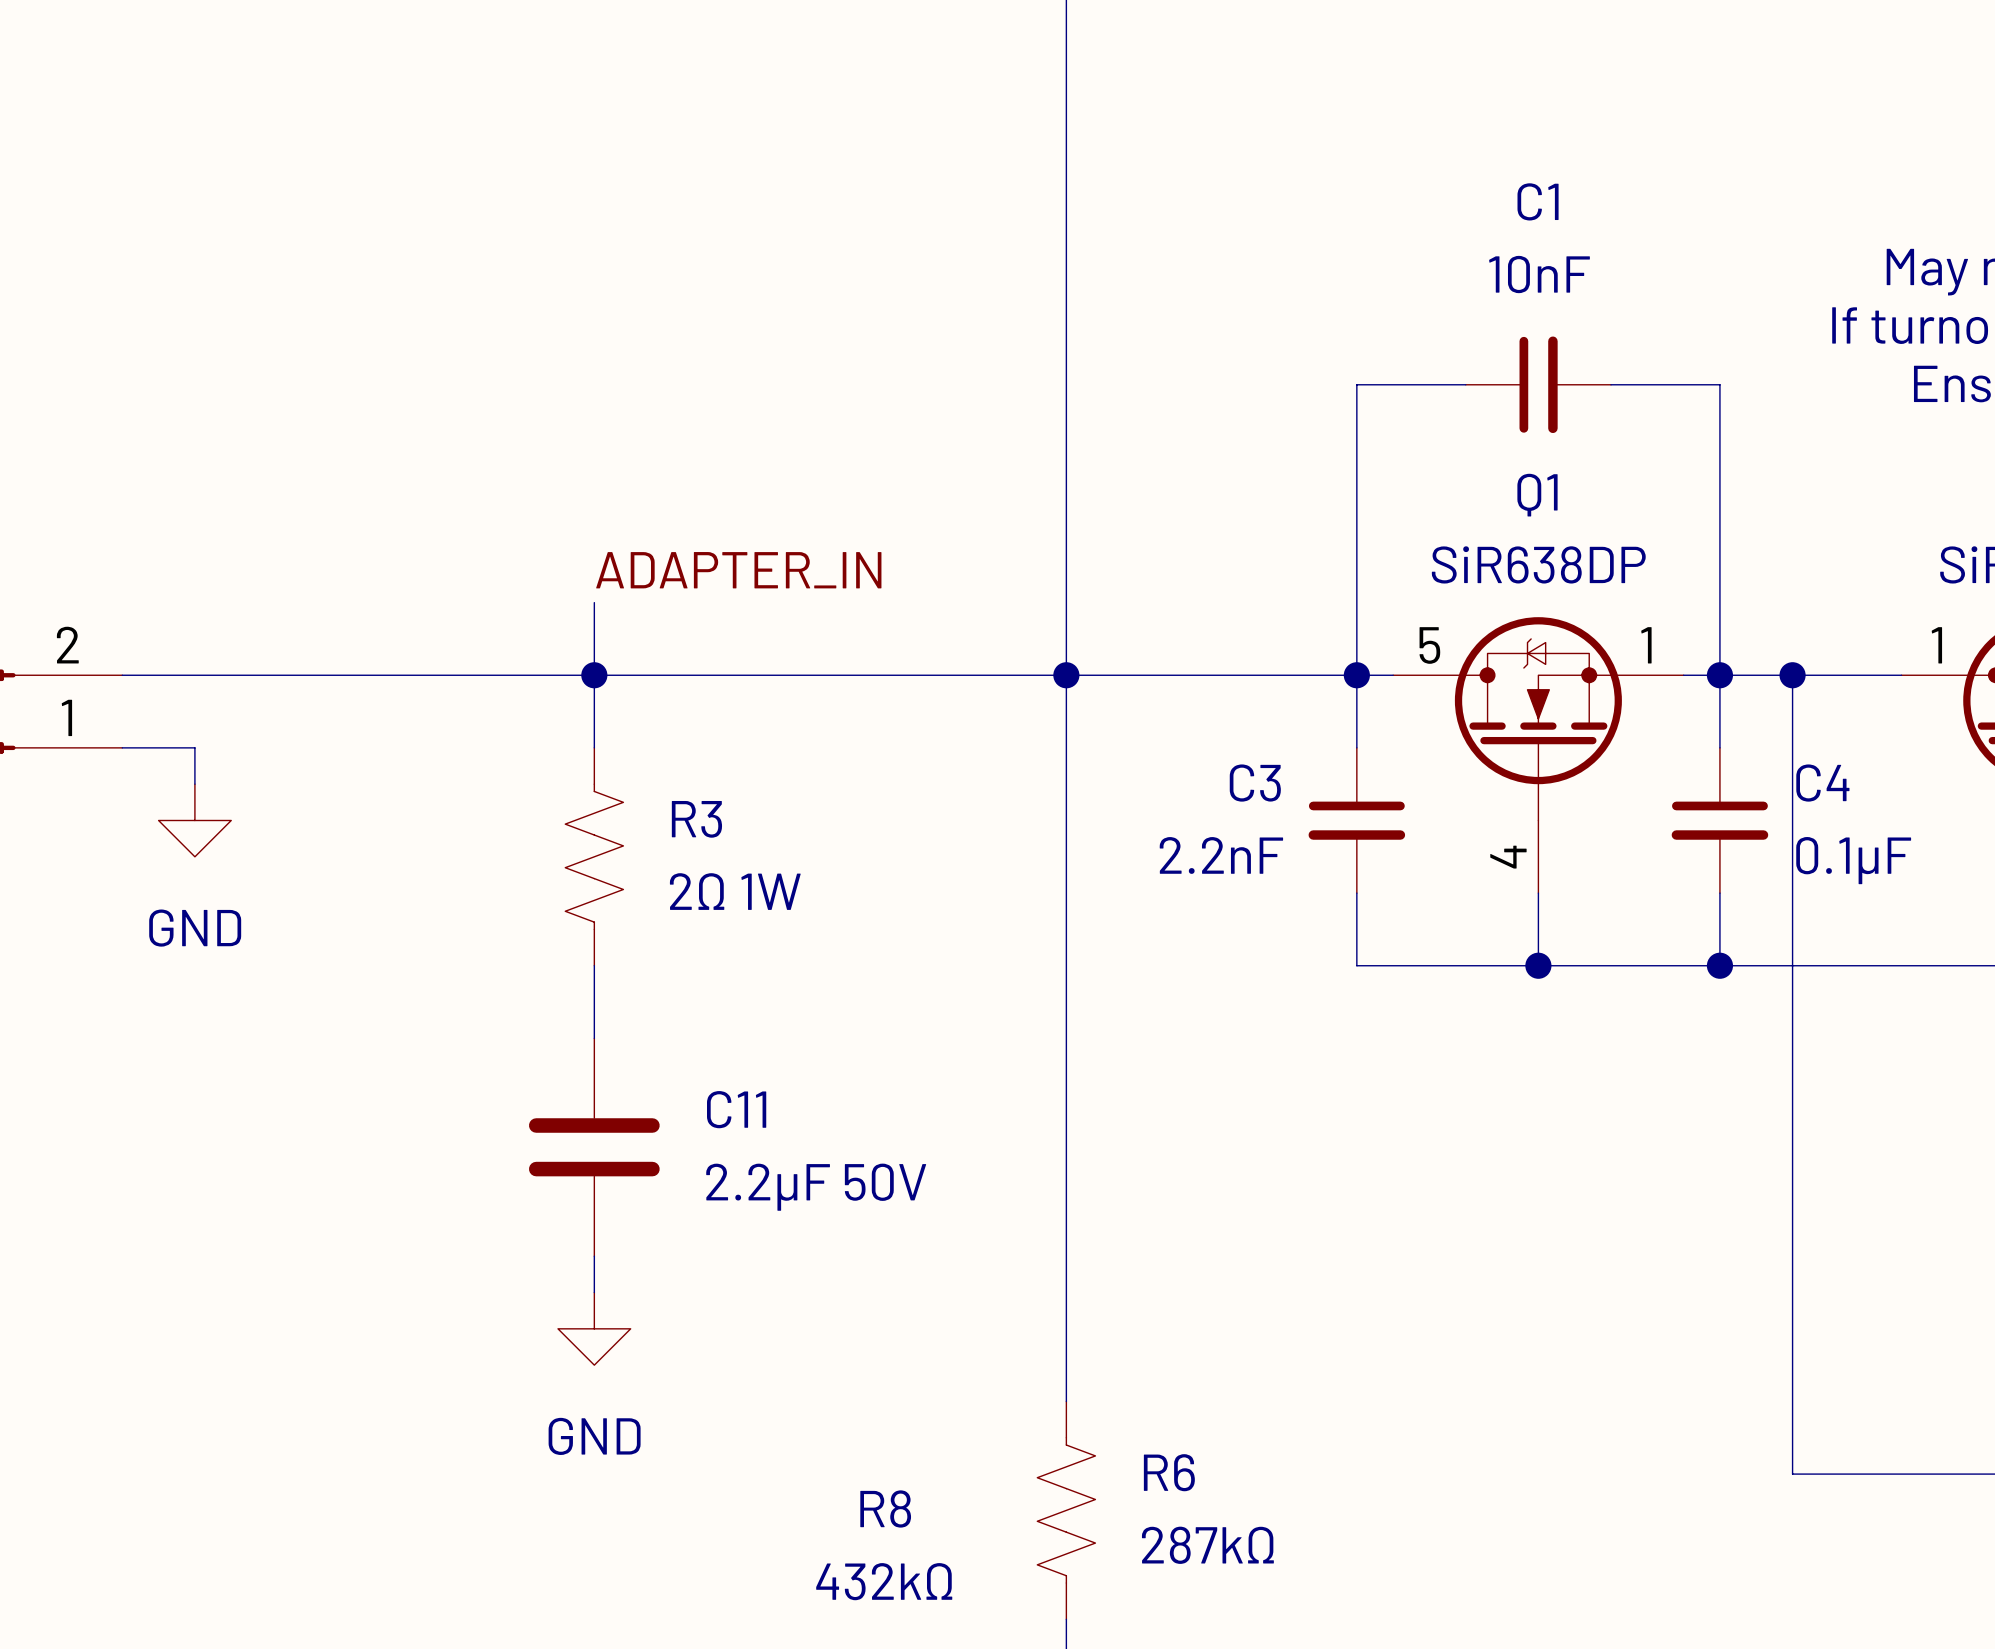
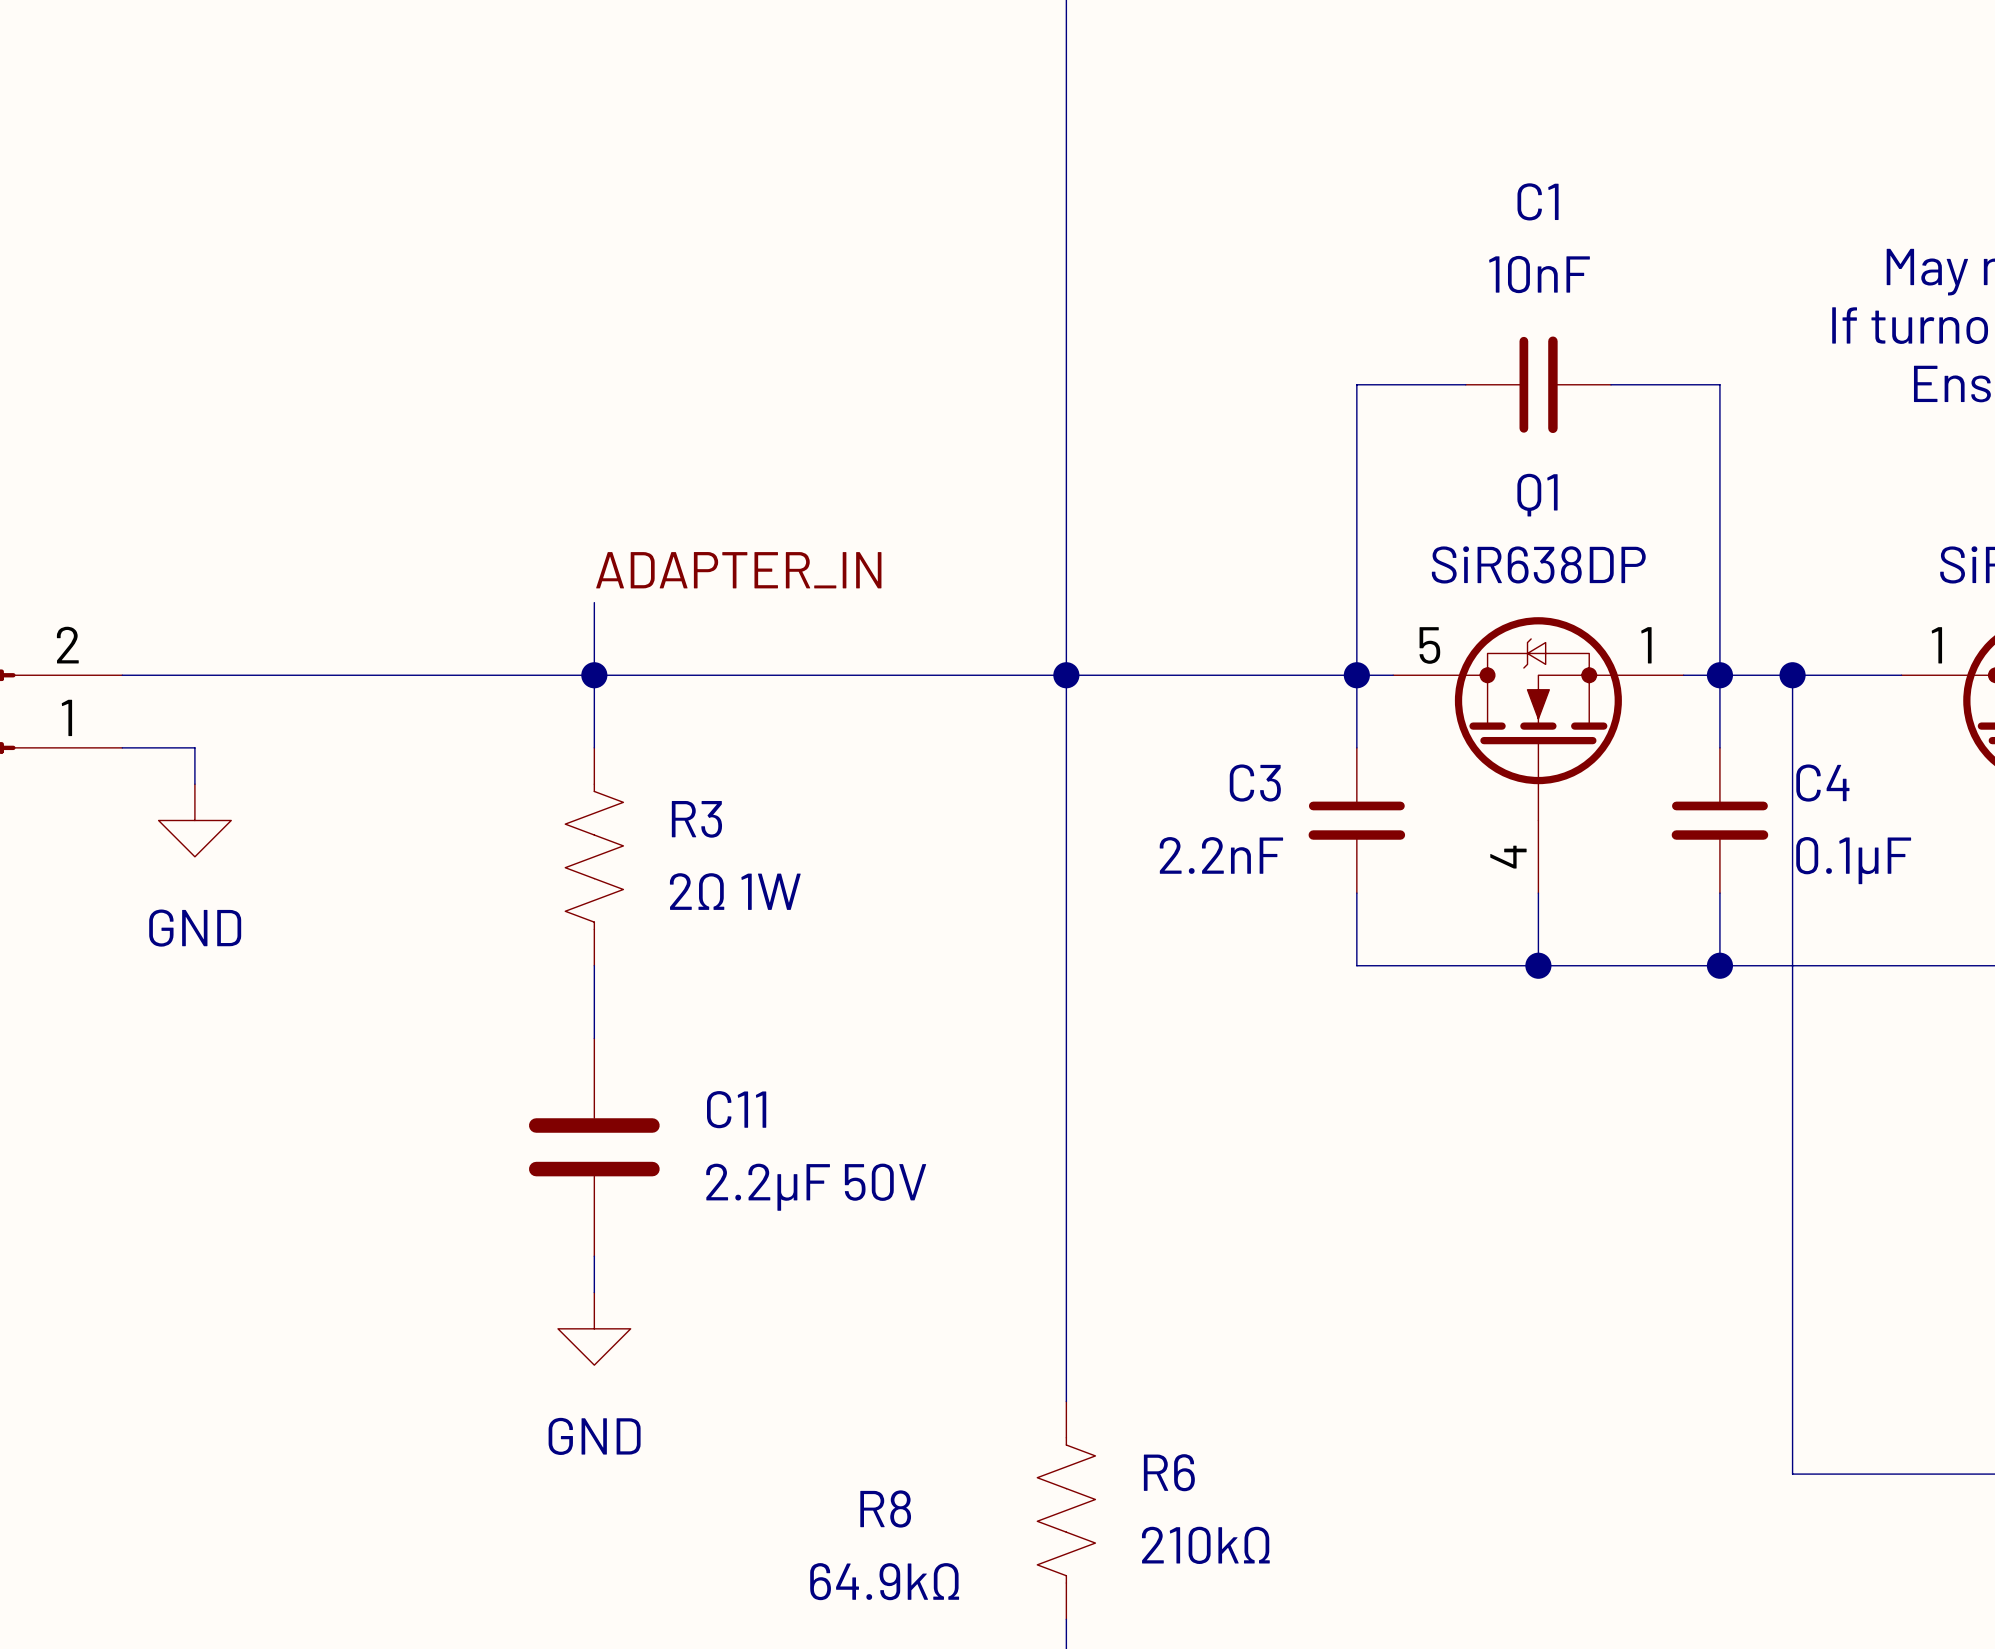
R6 value: 287kΩ (1207, 1545) -> 210kΩ (1205, 1545)
R8 value: 432kΩ (884, 1581) -> 64.9kΩ (884, 1581)

